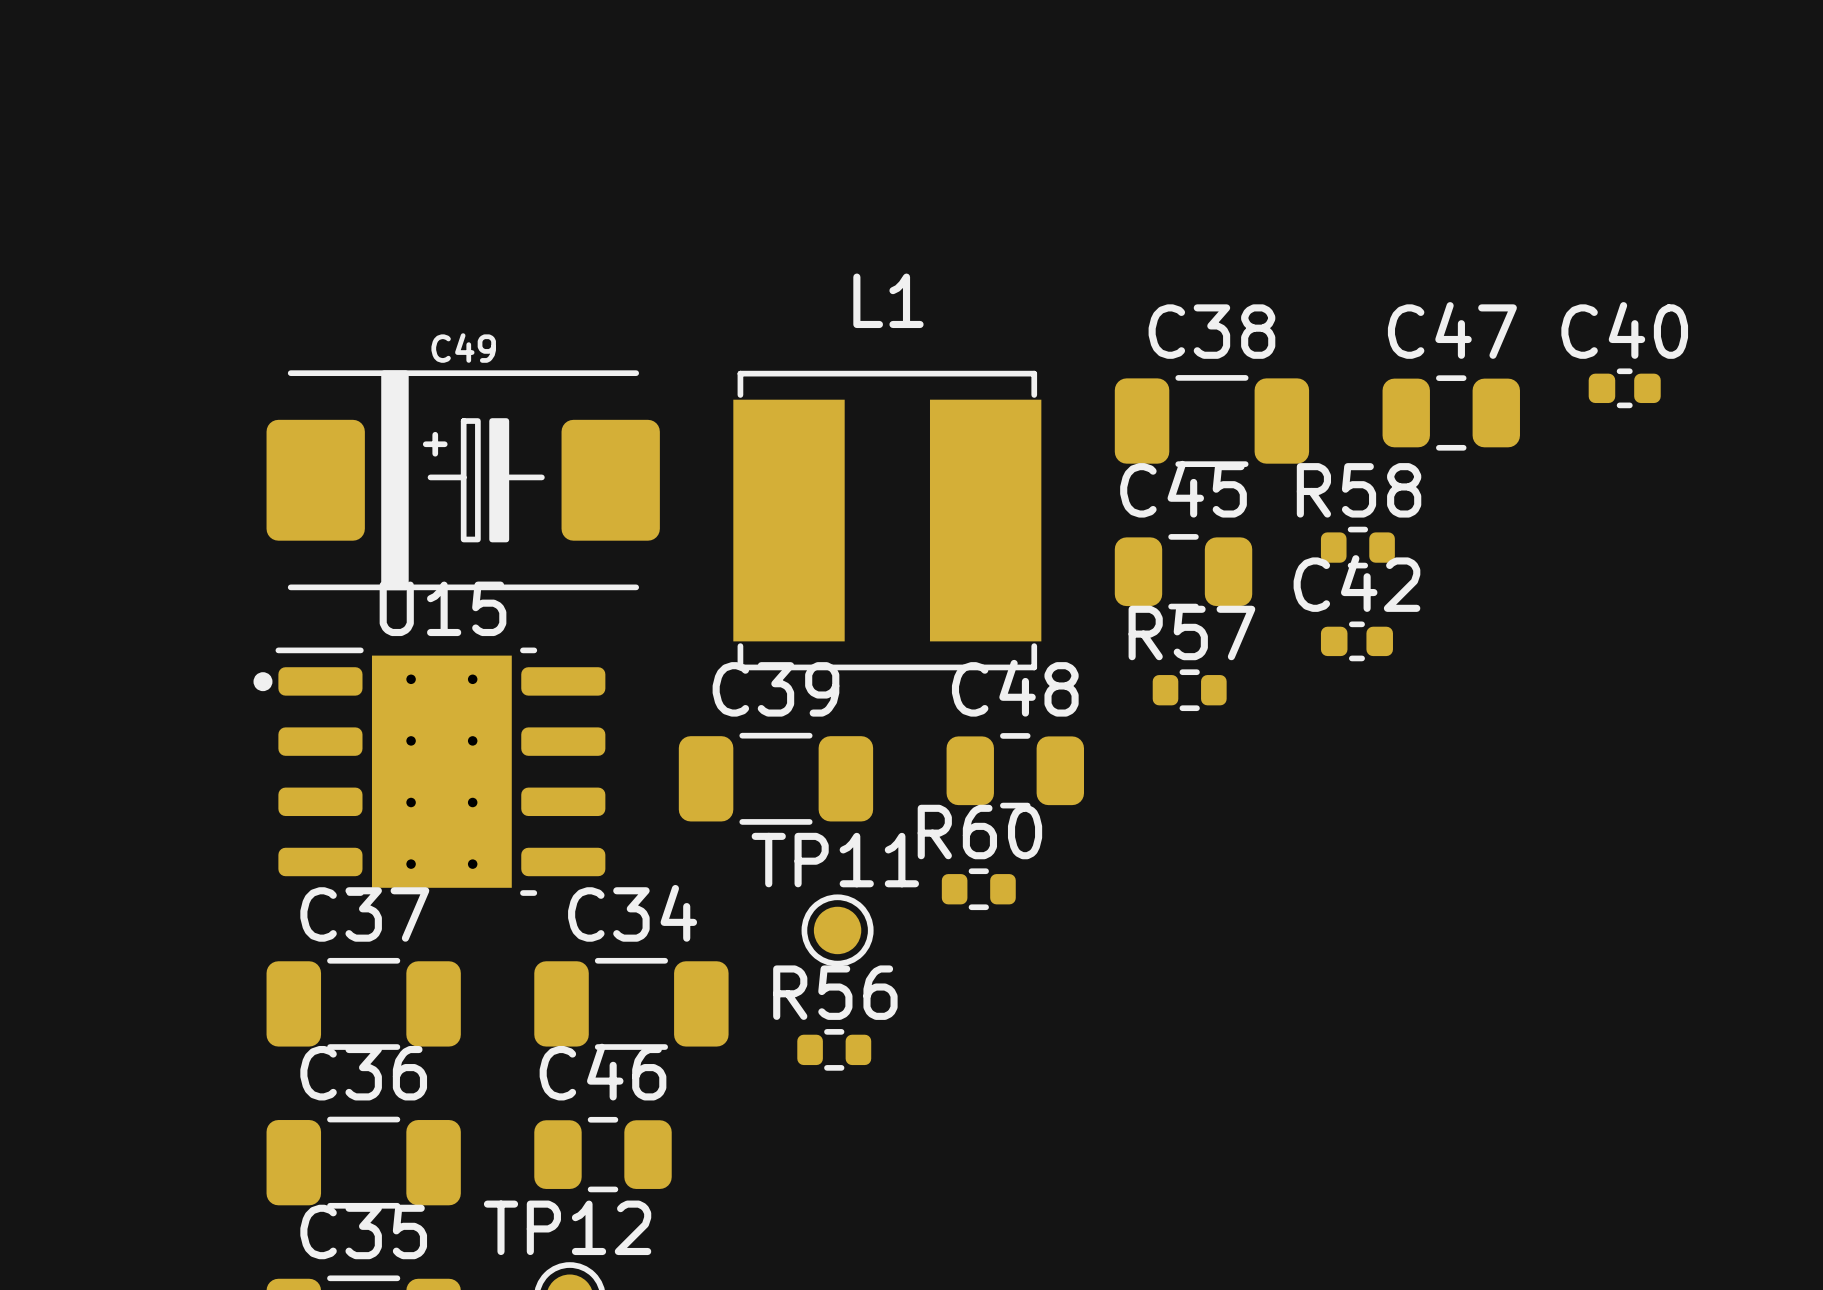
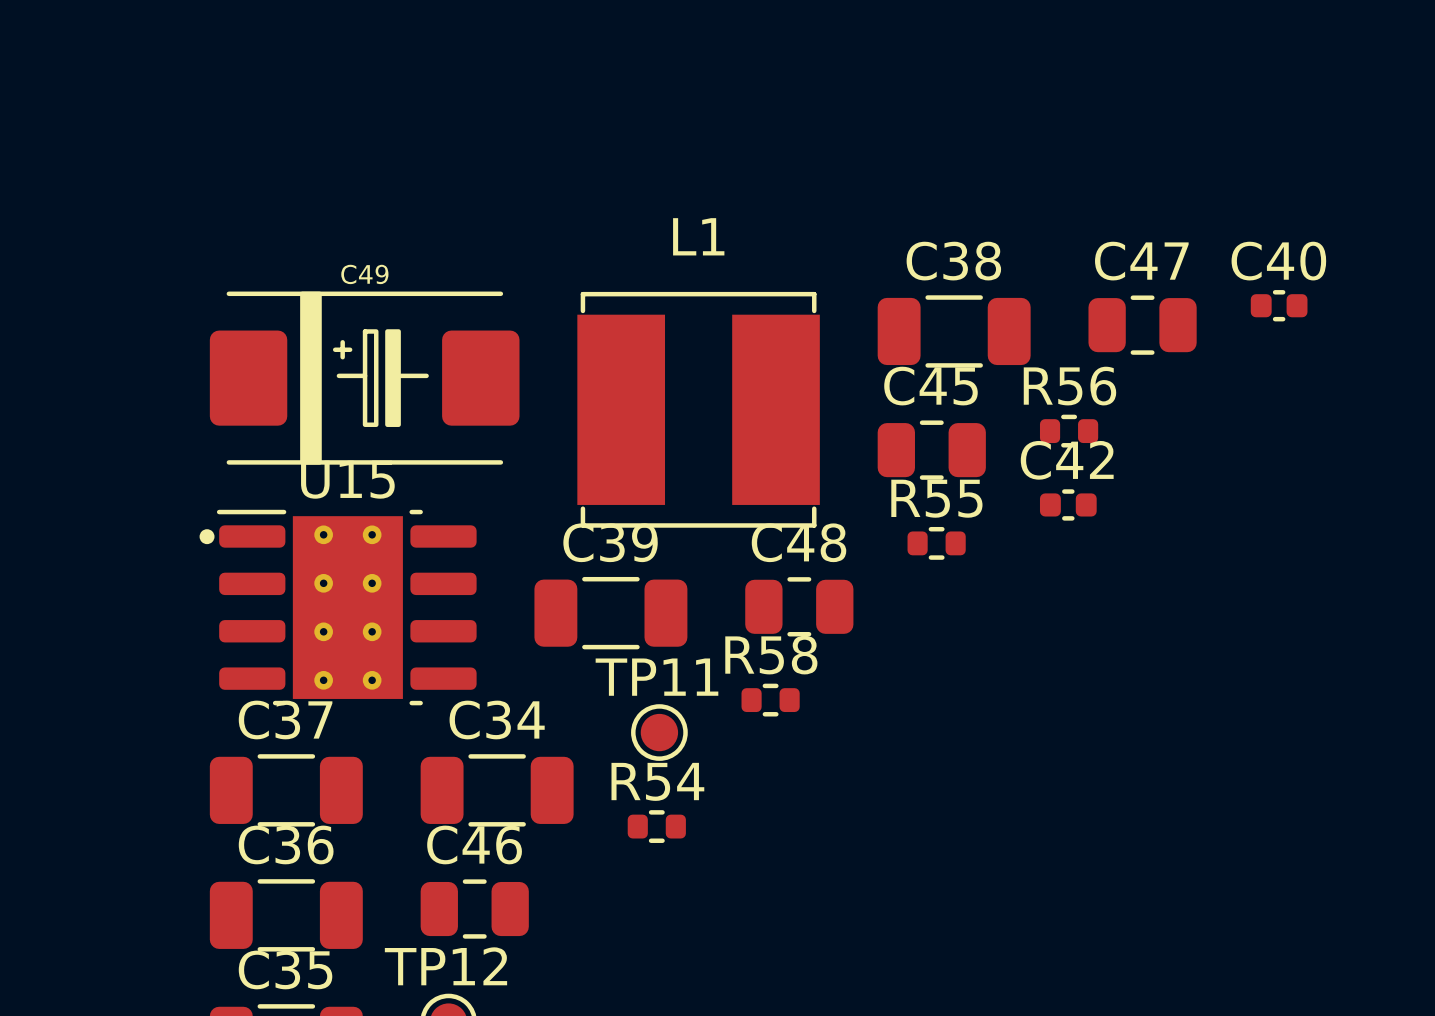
R58 name: R58 (1359, 490) -> R56 (1069, 386)
R57 name: R57 (1191, 632) -> R55 (936, 498)
R60 name: R60 (979, 832) -> R58 (771, 655)
R56 name: R56 (835, 992) -> R54 (657, 781)

